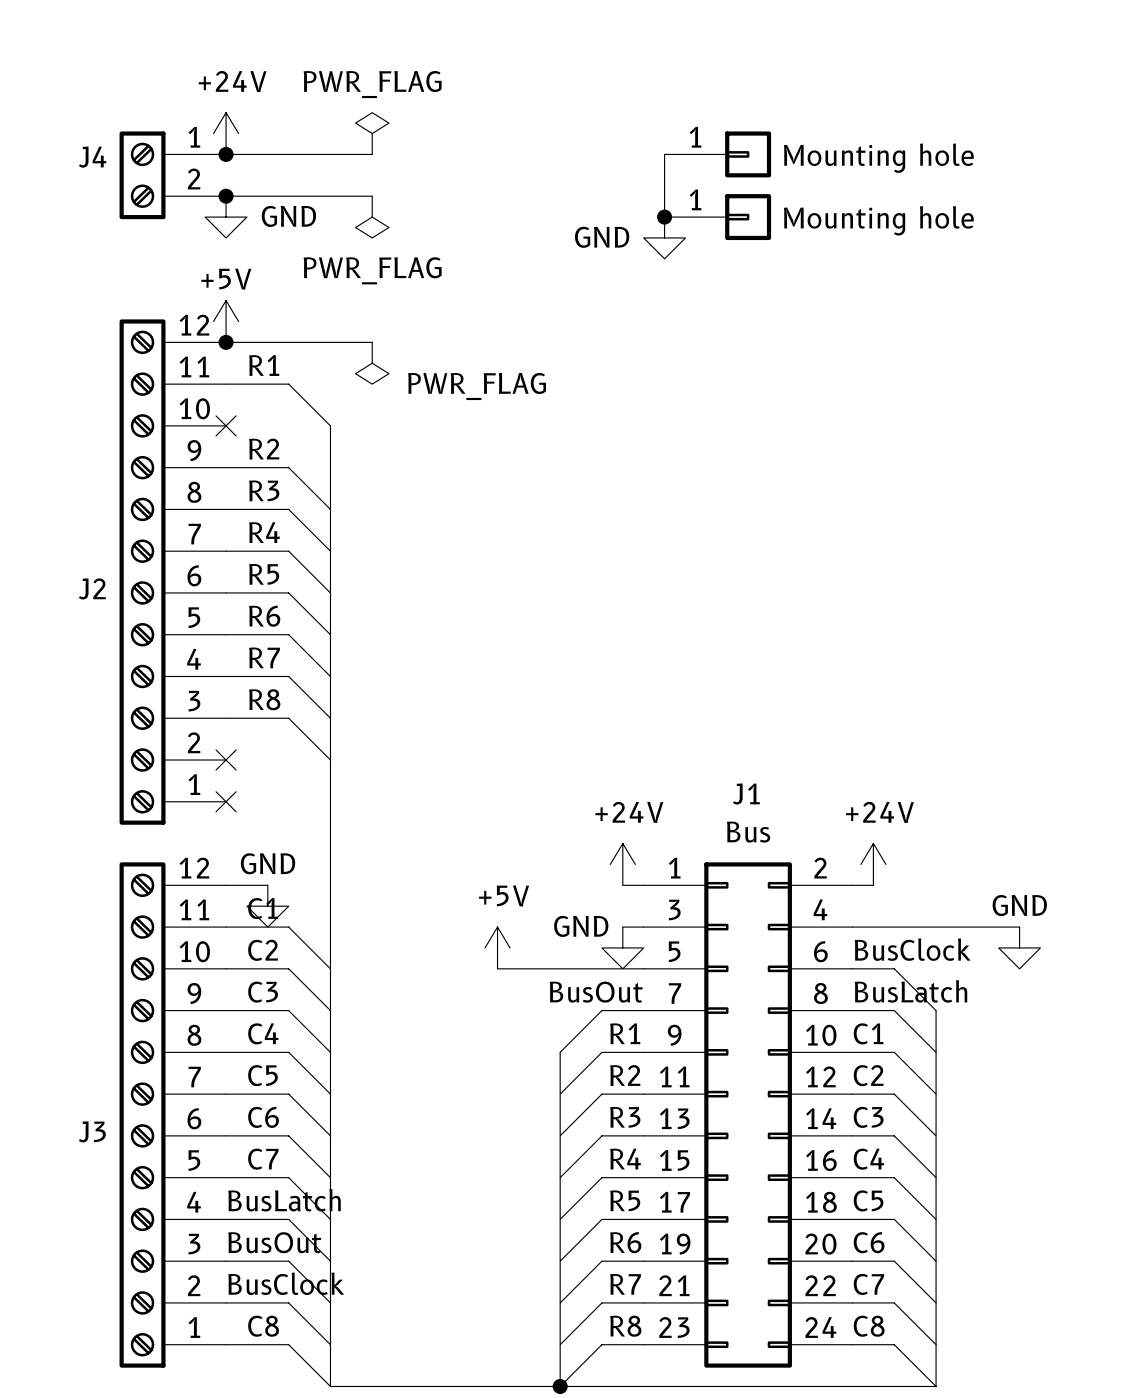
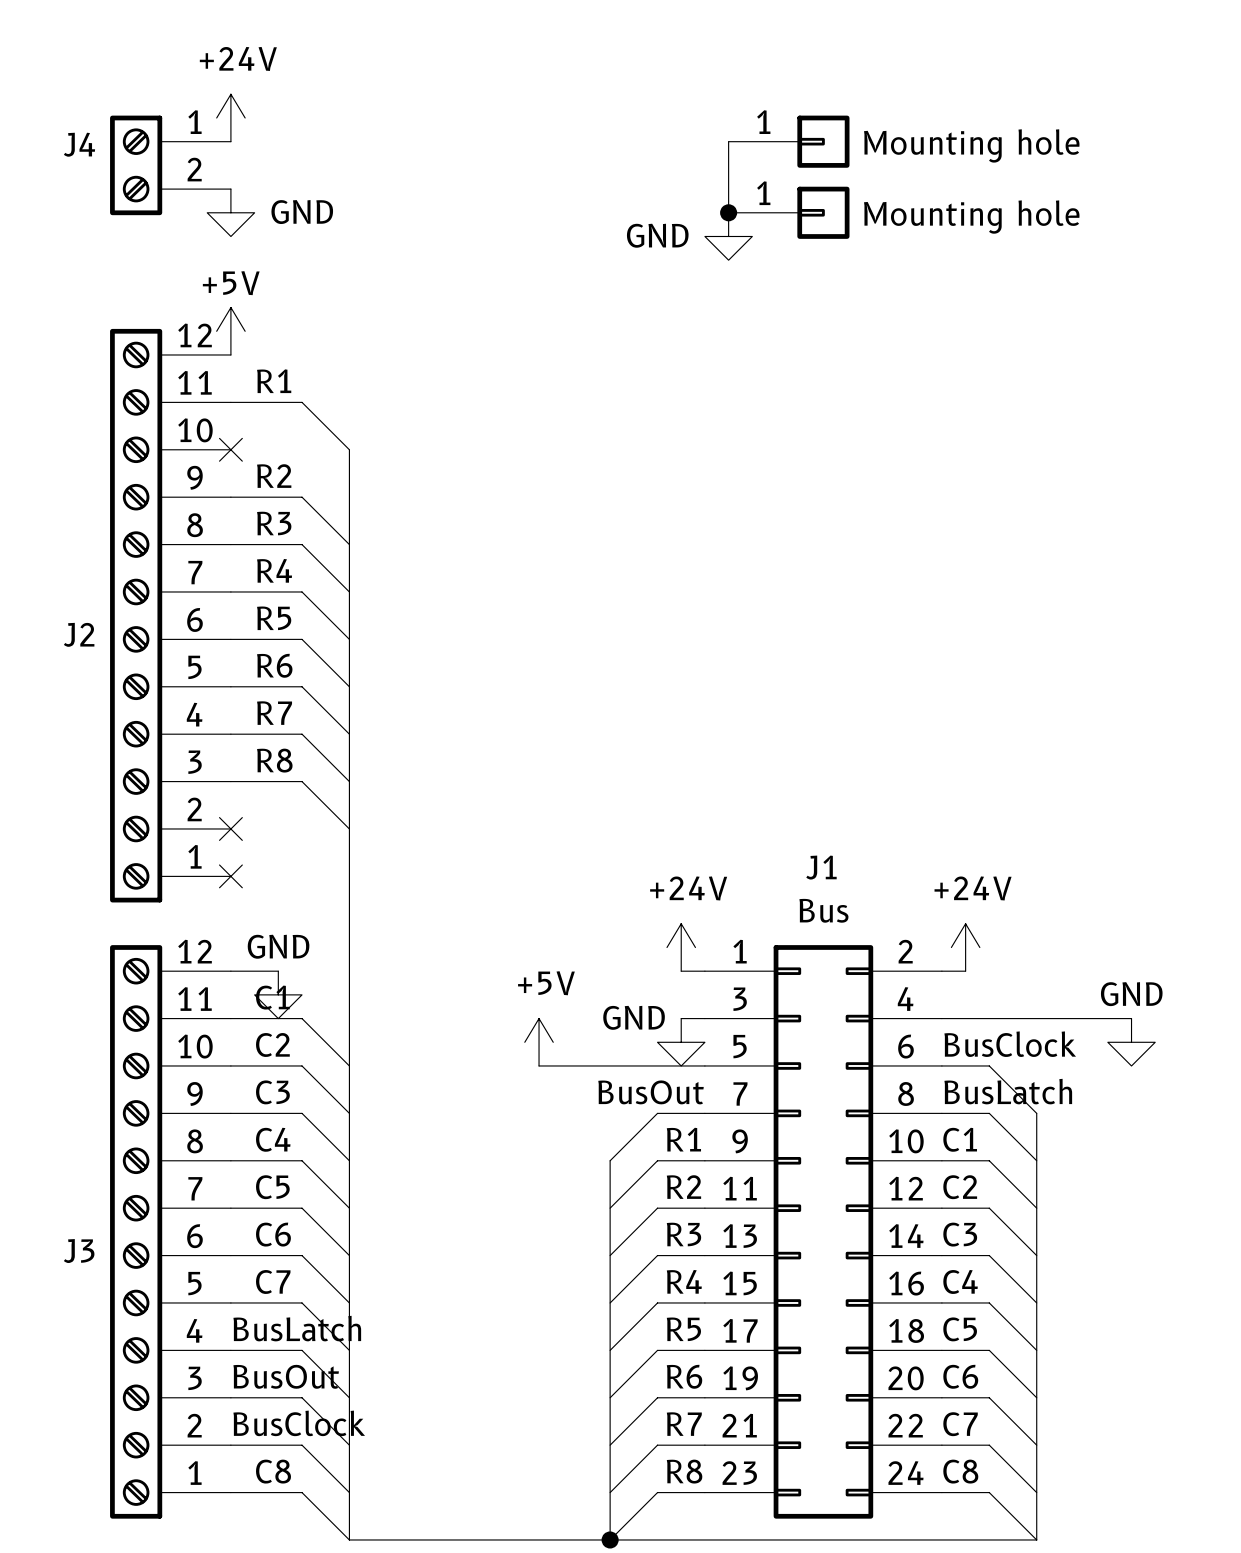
power symbol: PWR_FLAG (372, 133) -> none
wire: (226, 154) (372, 154) -> none
junction: (226, 154) -> none
wire: (226, 196) (372, 196) -> none
junction: (226, 196) -> none
power symbol: PWR_FLAG (372, 217) -> none
wire: (226, 342) (372, 342) -> none
junction: (226, 342) -> none
power symbol: PWR_FLAG (372, 363) -> none

